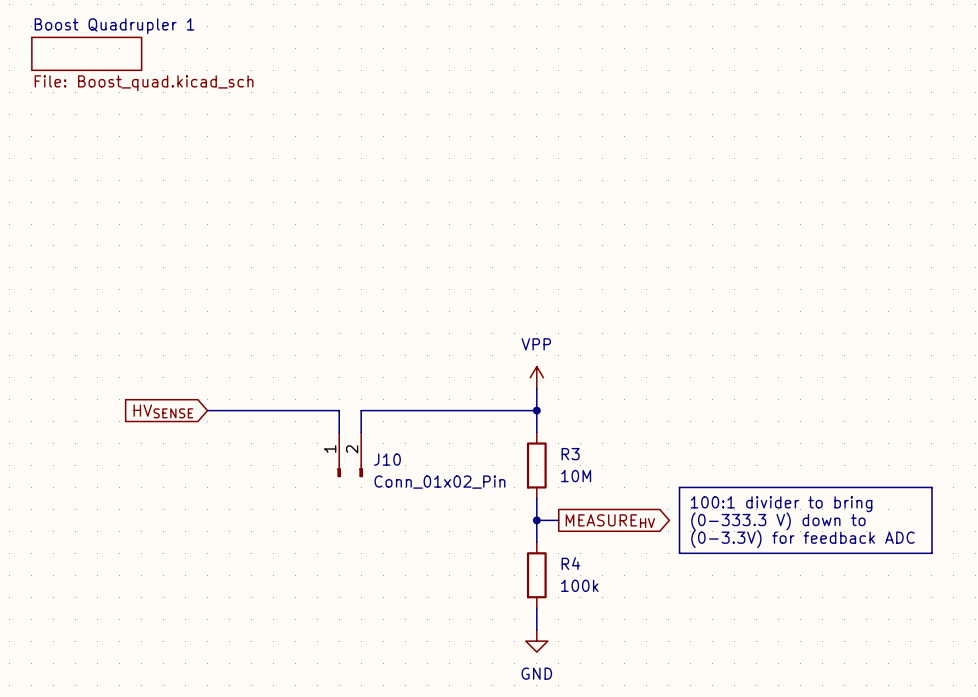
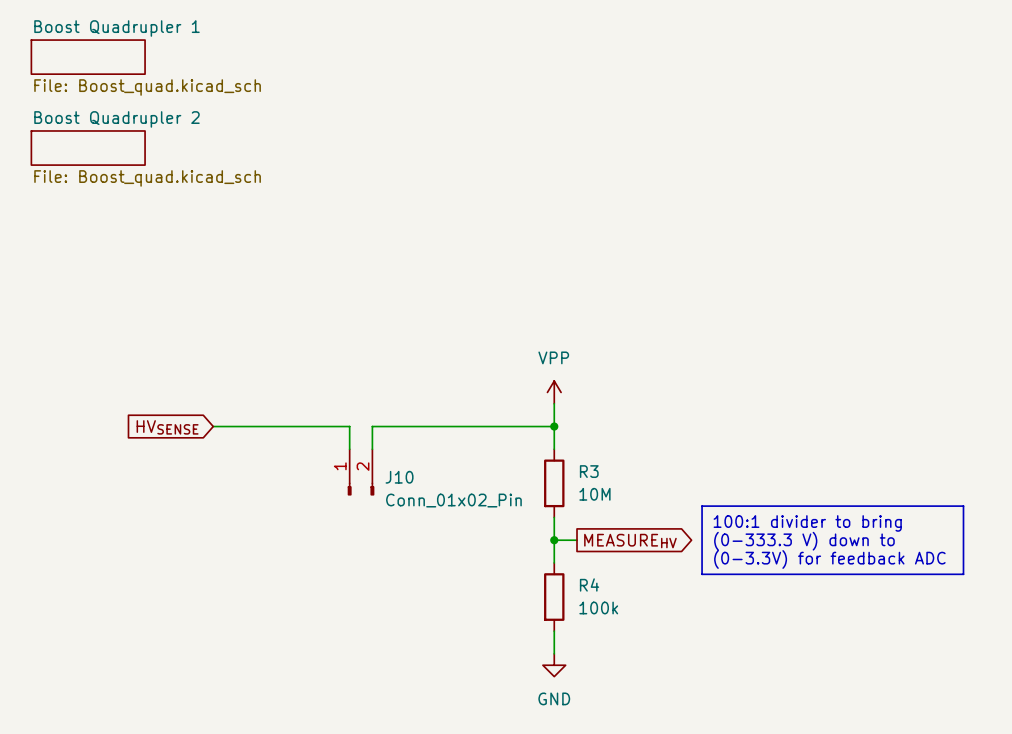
sheet Boost Quadrupler 2: none -> File: Boost_quad.kicad_sch (88, 148)

